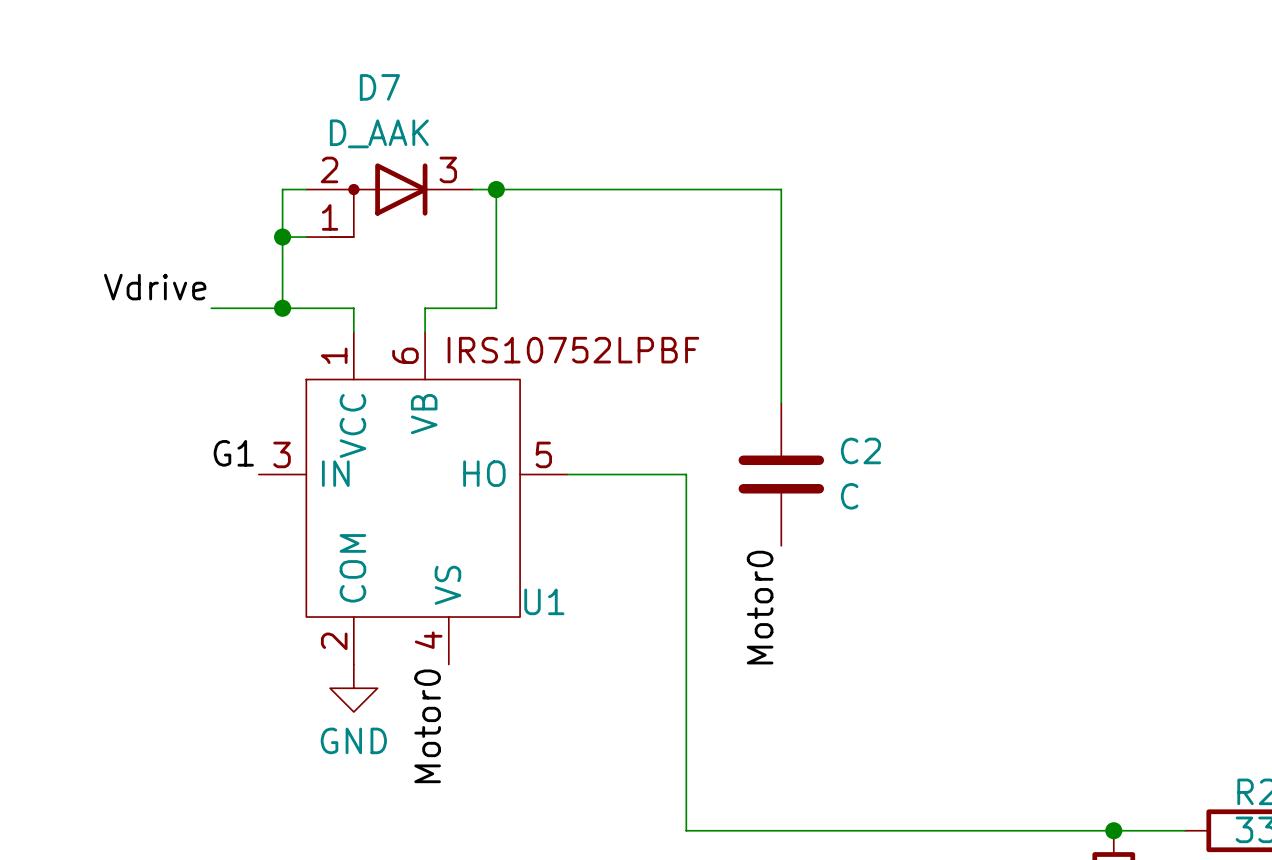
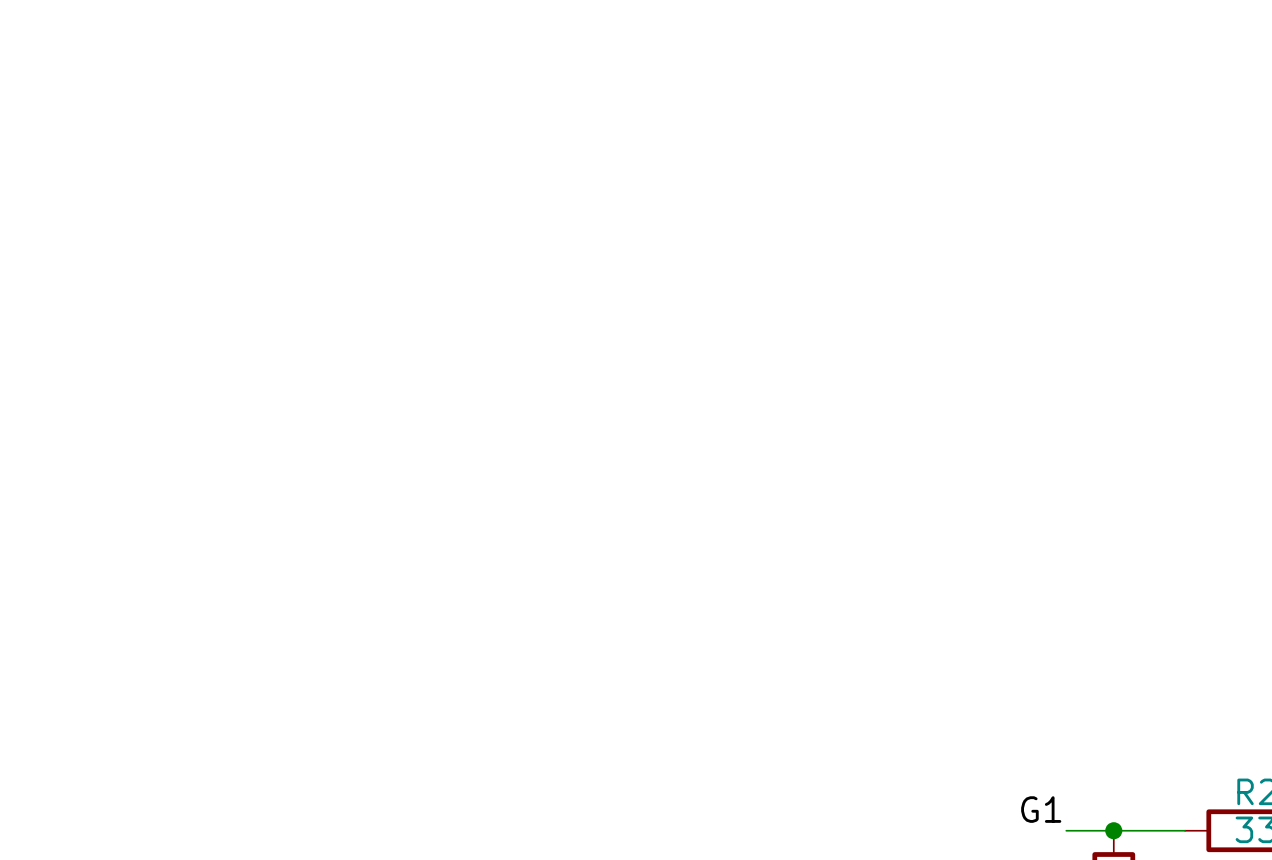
wire: (306, 189) (282, 189) (282, 308) -> none
wire: (472, 189) (781, 189) (781, 403) -> none
wire: (496, 189) (496, 308) (425, 308) (425, 332) -> none
junction: (496, 189) -> none
D7: D_AAK (389, 200) -> none
wire: (282, 237) (306, 237) -> none
junction: (282, 237) -> none
label: Vdrive (155, 287) -> none
wire: (211, 308) (353, 308) (353, 332) -> none
junction: (282, 308) -> none
label: G1 (233, 453) -> none
wire: (567, 474) (686, 474) (686, 830) (1066, 830) -> none
C2: C (781, 474) -> none
U1: (413, 498) -> none
label: Motor0 (760, 607) -> none
power symbol: GND (353, 688) -> none
label: Motor0 (427, 726) -> none
label: none -> G1 (1041, 809)

